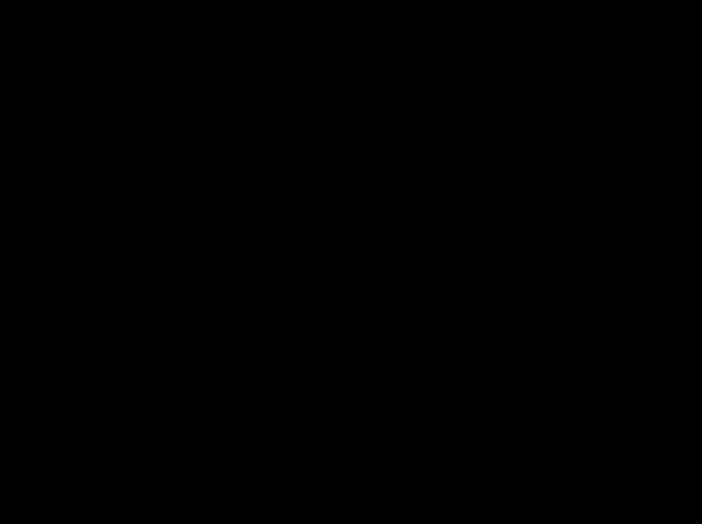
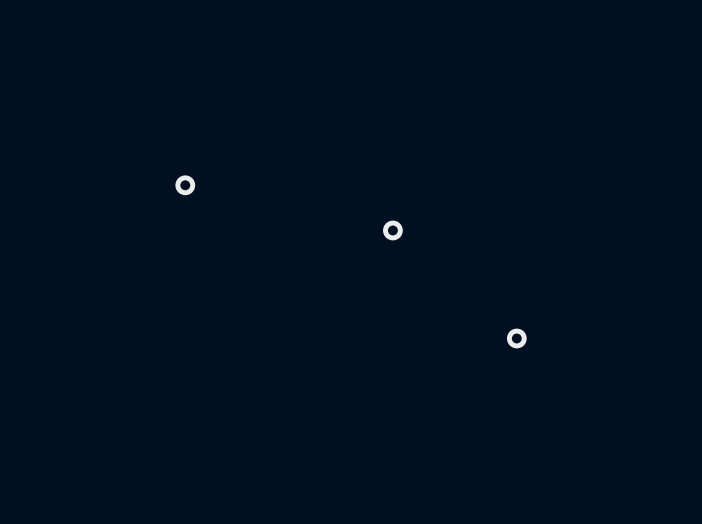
via: none -> (185, 185)
via: none -> (392, 230)
via: none -> (516, 338)

